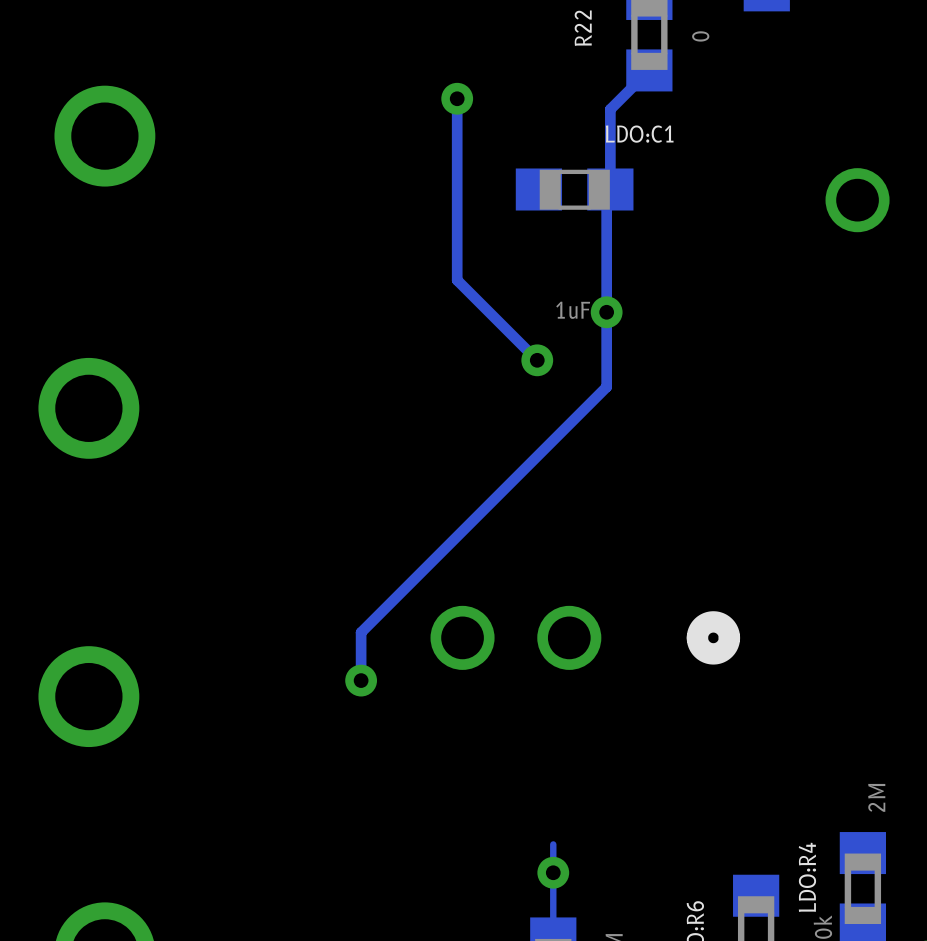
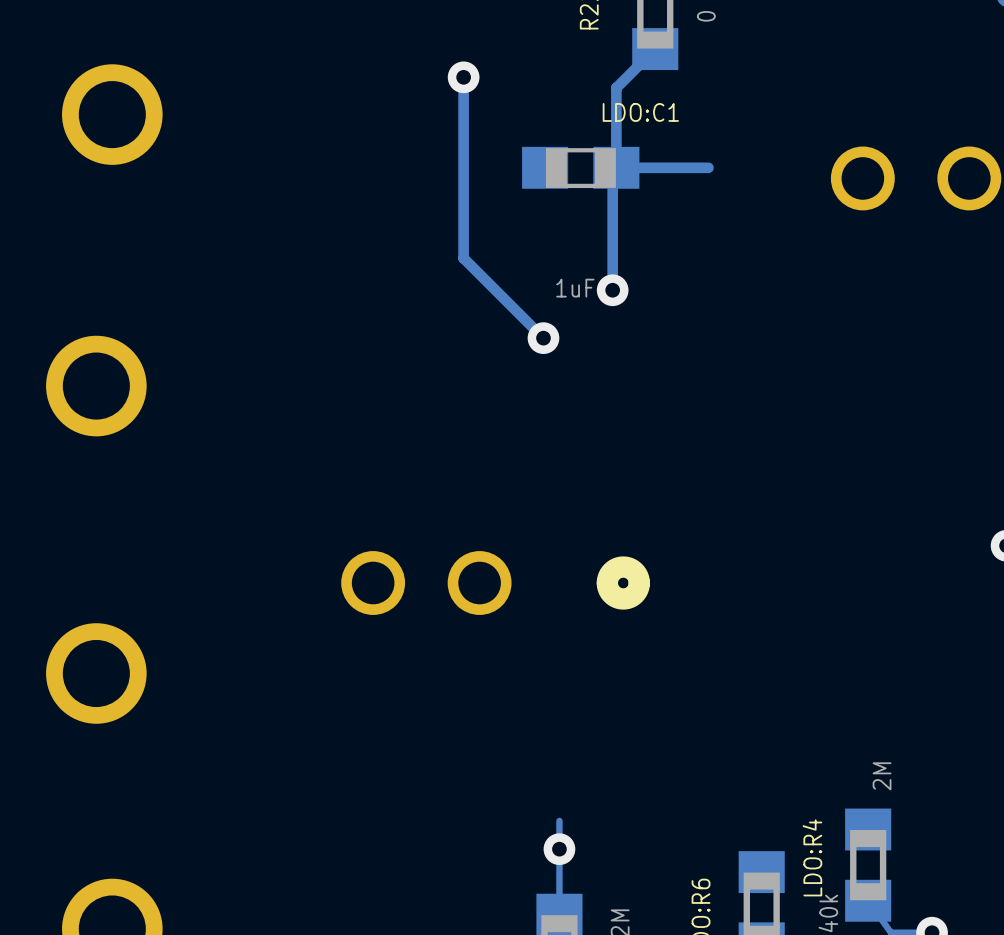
track: none -> (708, 167) (616, 167)
track: (606, 312) (606, 387) (361, 632) (361, 680) -> none
part position: (585, 637) -> (495, 583)
via: (361, 680) -> none

